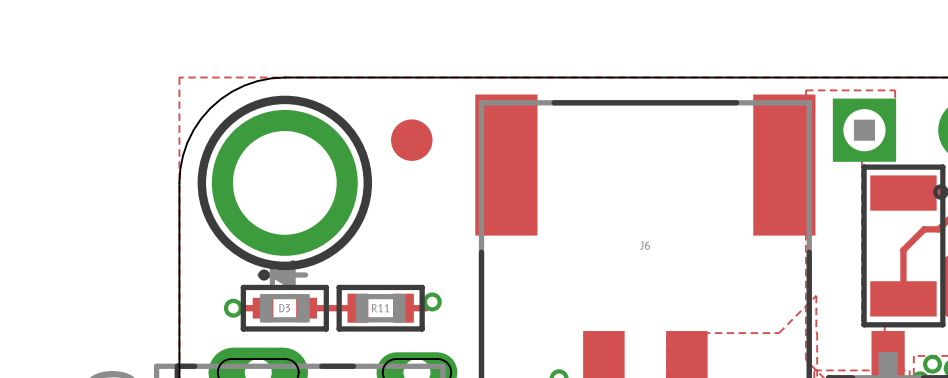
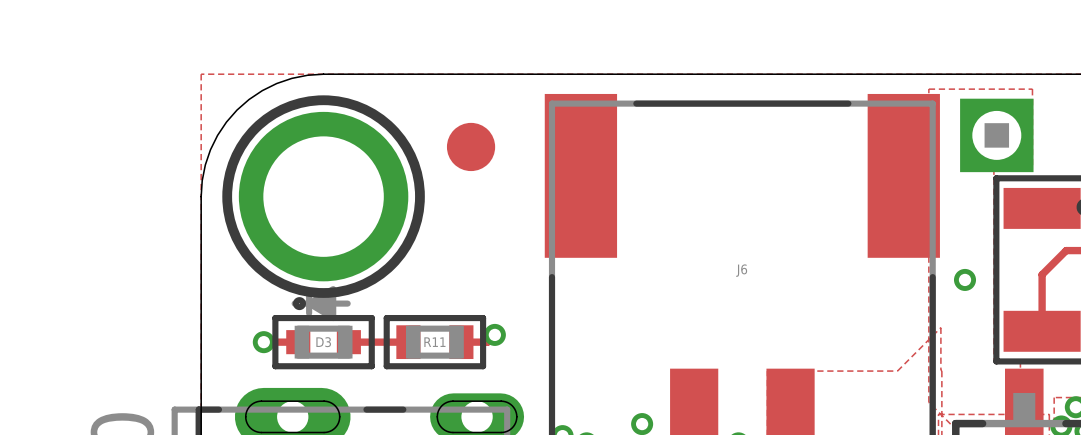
via: none -> (965, 279)

